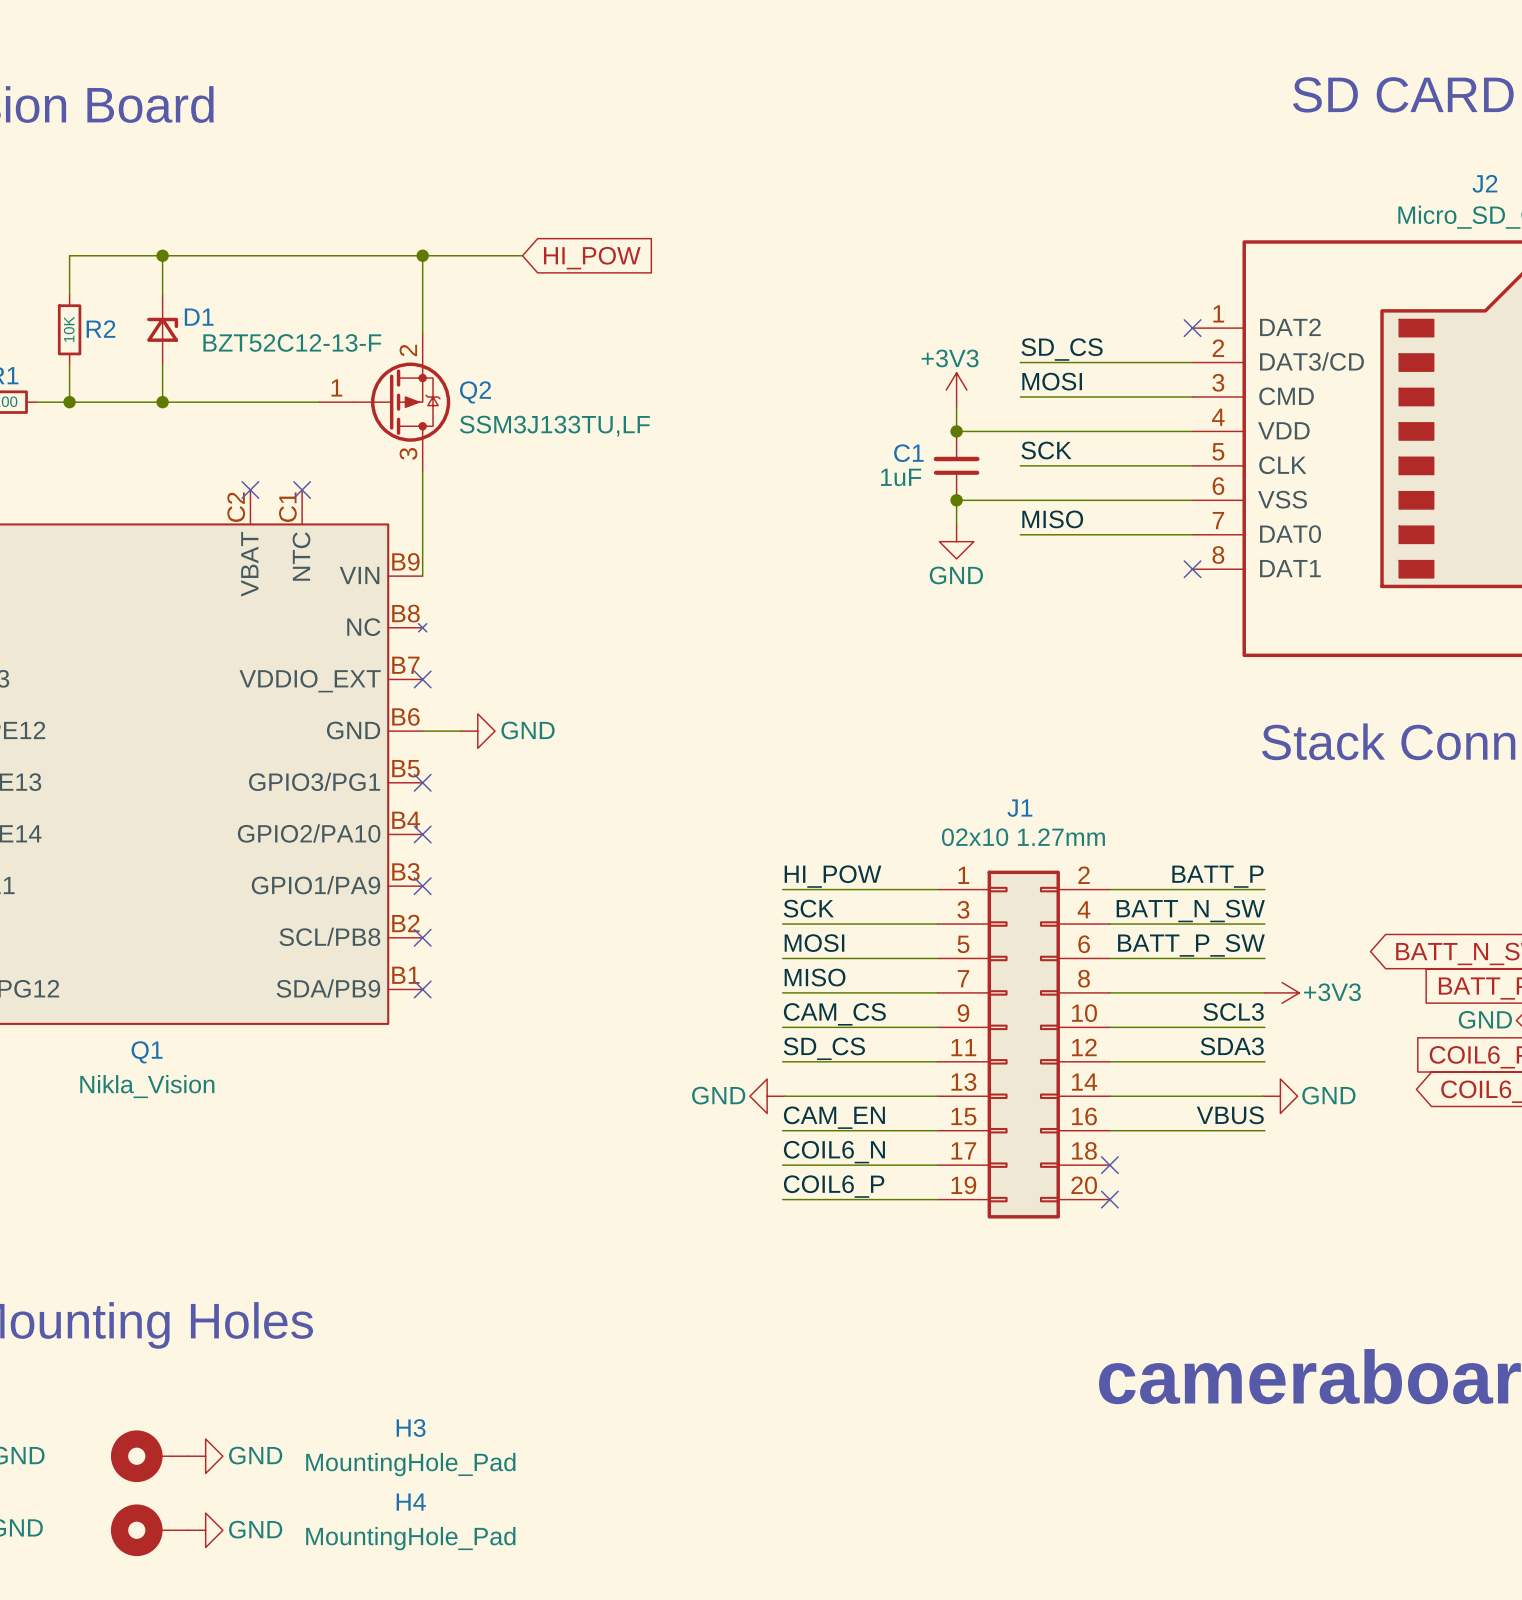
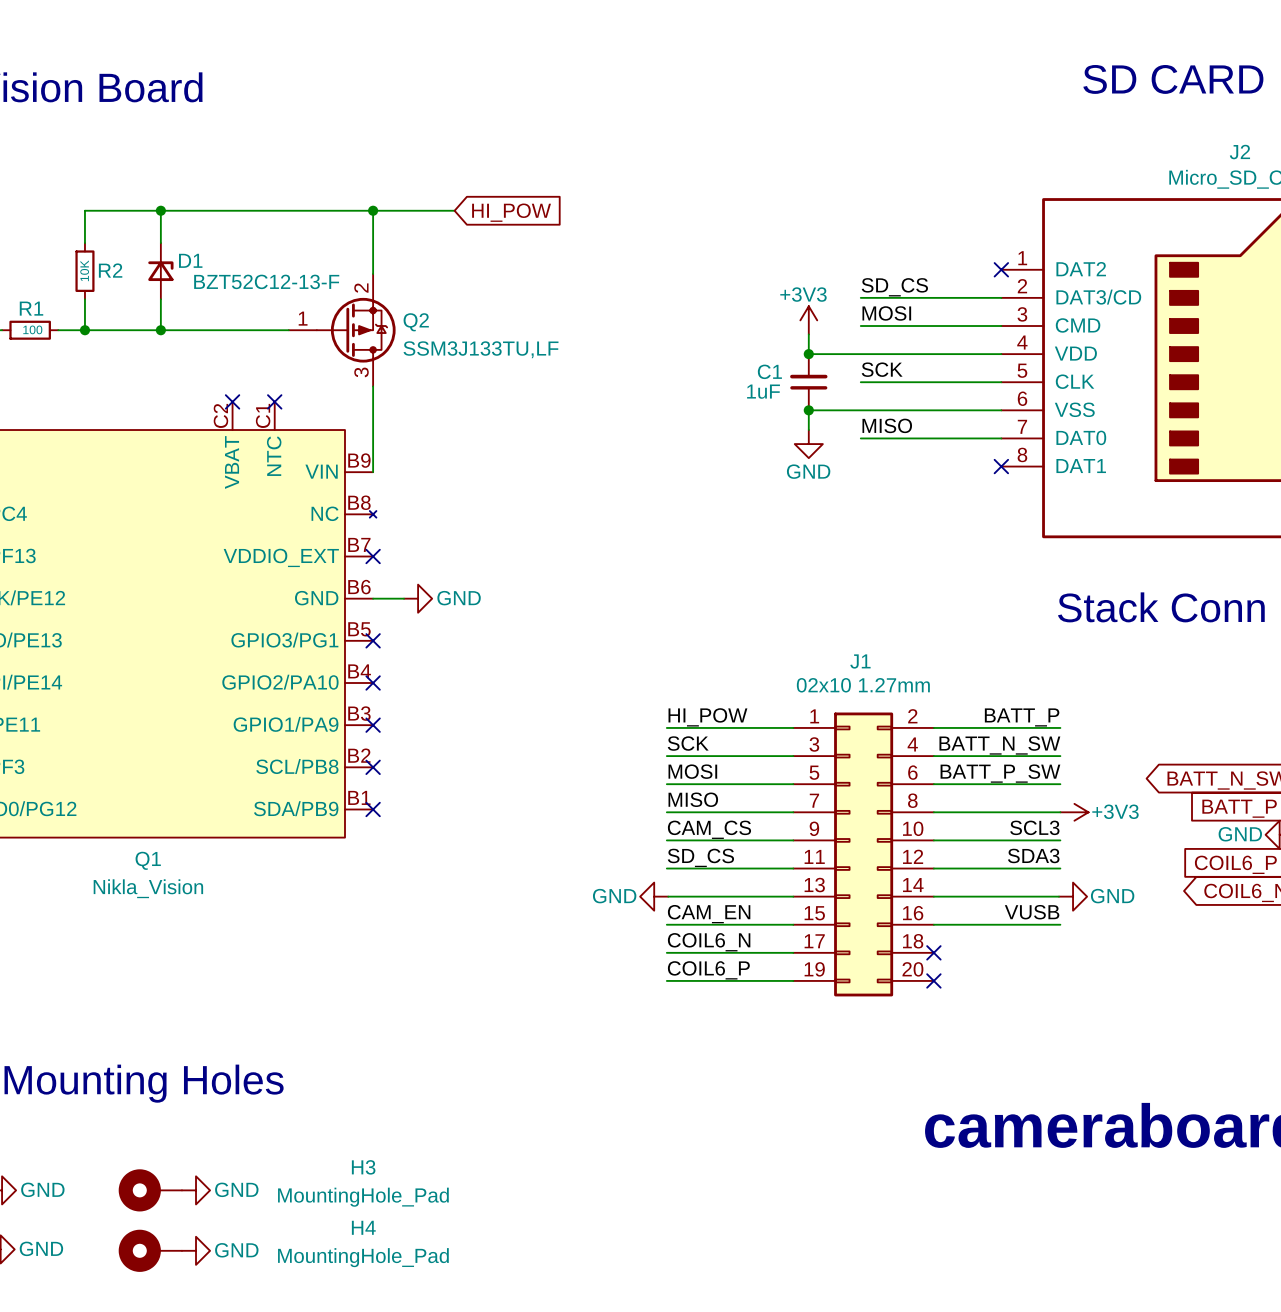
label: VBUS (1230, 1115) -> VUSB (1032, 912)

